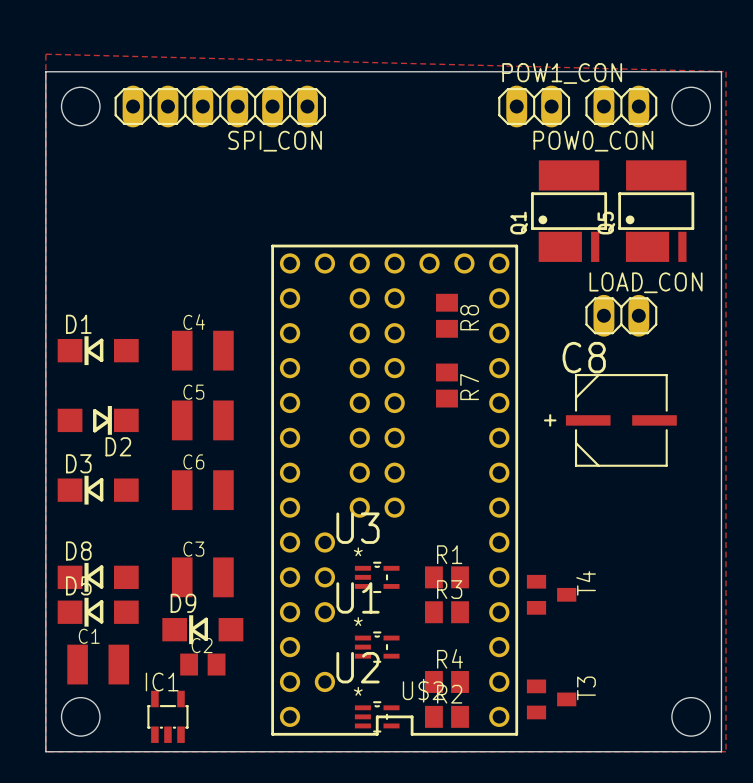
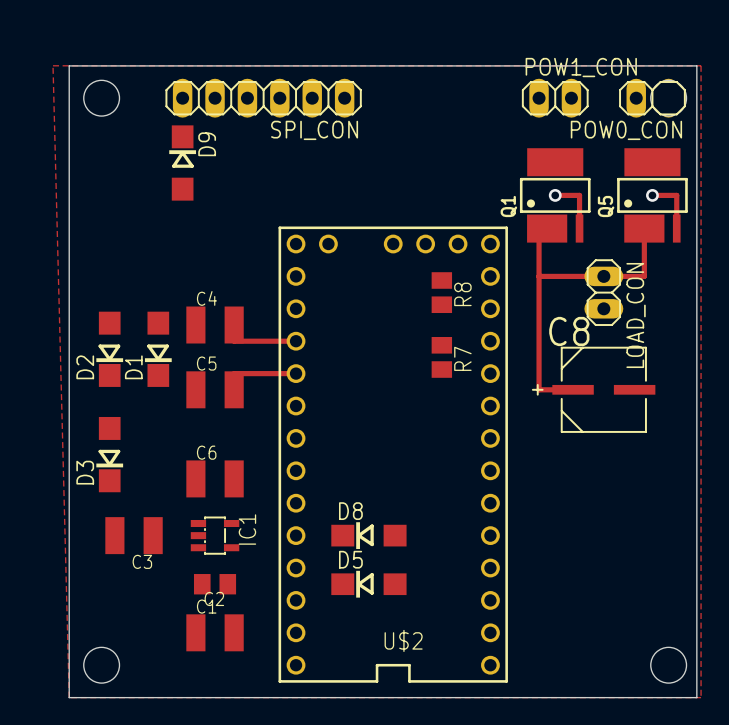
zone outline: (726, 71) (45, 54) (45, 751) -> (701, 65) (53, 65) (69, 697)
SPI_CON position: (220, 106) -> (263, 98)
POW1_CON position: (534, 106) -> (555, 98)
POW0_CON position: (621, 106) -> (652, 98)
track: none -> (555, 195) (579, 195) (579, 228)
via: none -> (555, 195)
Q5 position: (656, 211) -> (652, 195)
track: none -> (652, 195) (676, 195) (676, 228)
via: none -> (652, 195)
U$2 footprint: [271, 244, 519, 736] -> [278, 226, 508, 683]
track: none -> (547, 228) (539, 228) (539, 389) (573, 389)
track: none -> (644, 228) (644, 276) (539, 276)
LOAD_CON rotation: 0° (621, 315) -> 90° clockwise (603, 292)
D1 rotation: 0° (98, 350) -> 90° counterclockwise (158, 349)
D1 position: (98, 350) -> (158, 349)
track: none -> (234, 325) (234, 341) (296, 341)
track: none -> (296, 373) (234, 373) (234, 389)
D2 rotation: 0° (98, 420) -> 90° clockwise (109, 349)
D3 rotation: 0° (98, 490) -> 90° counterclockwise (109, 454)
C6 position: (202, 490) -> (215, 478)
C3 name position: C3 (193, 549) -> C3 (142, 561)
D8 position: (98, 577) -> (368, 535)
C3 position: (202, 577) -> (134, 535)
U3: (377, 577) -> none
R1: (446, 577) -> none
T4: (551, 594) -> none
D5 position: (98, 612) -> (368, 584)
R3: (446, 612) -> none
D9 rotation: 0° (202, 629) -> 90° clockwise (182, 163)
D9 position: (202, 629) -> (182, 163)
U1: (377, 647) -> none
C1 position: (98, 664) -> (215, 632)
C2 position: (202, 664) -> (215, 584)
R4: (446, 681) -> none
T3: (551, 699) -> none
IC1 rotation: 0° (167, 716) -> 90° clockwise (215, 535)
IC1 position: (167, 716) -> (215, 535)
U2: (377, 716) -> none
R2: (446, 716) -> none

